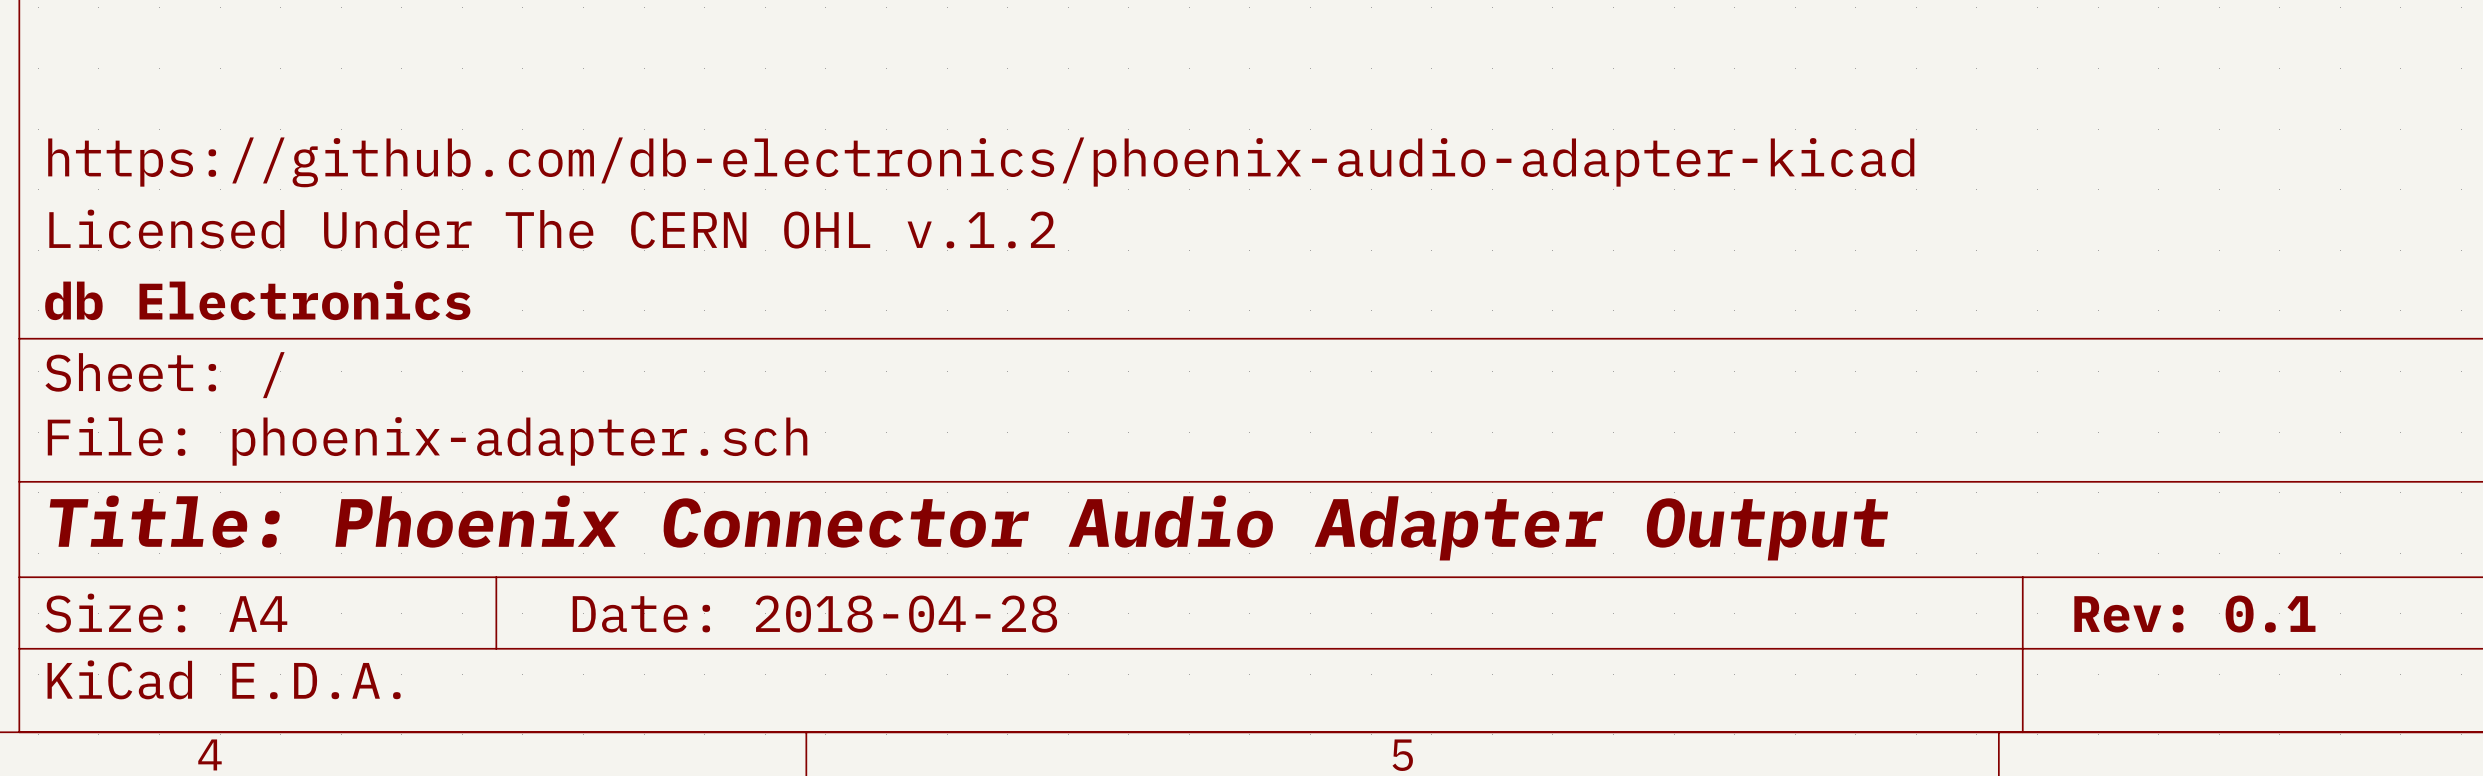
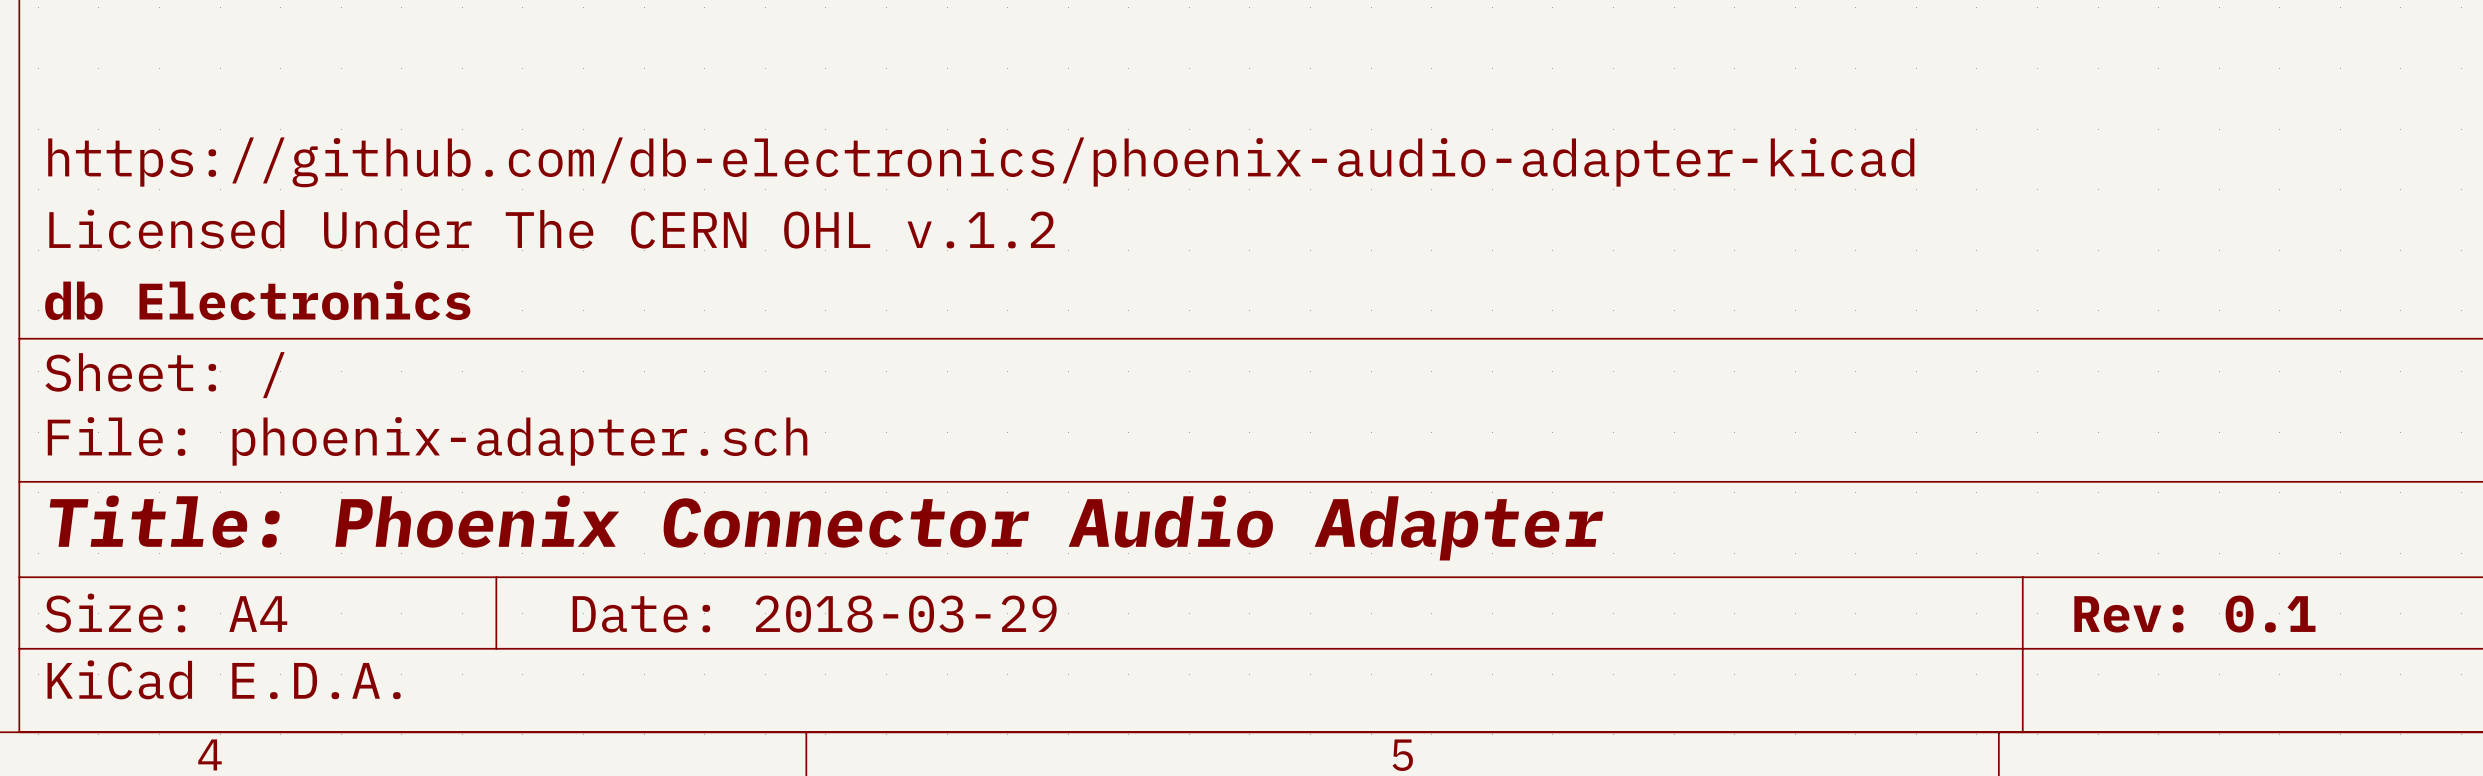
title block: Title: Phoenix Connector Audio Adapter Output (968, 528) -> Title: Phoenix Connector Audio Adapter (826, 528)
title block: Date: 2018-04-28 (814, 614) -> Date: 2018-03-29 (814, 614)

